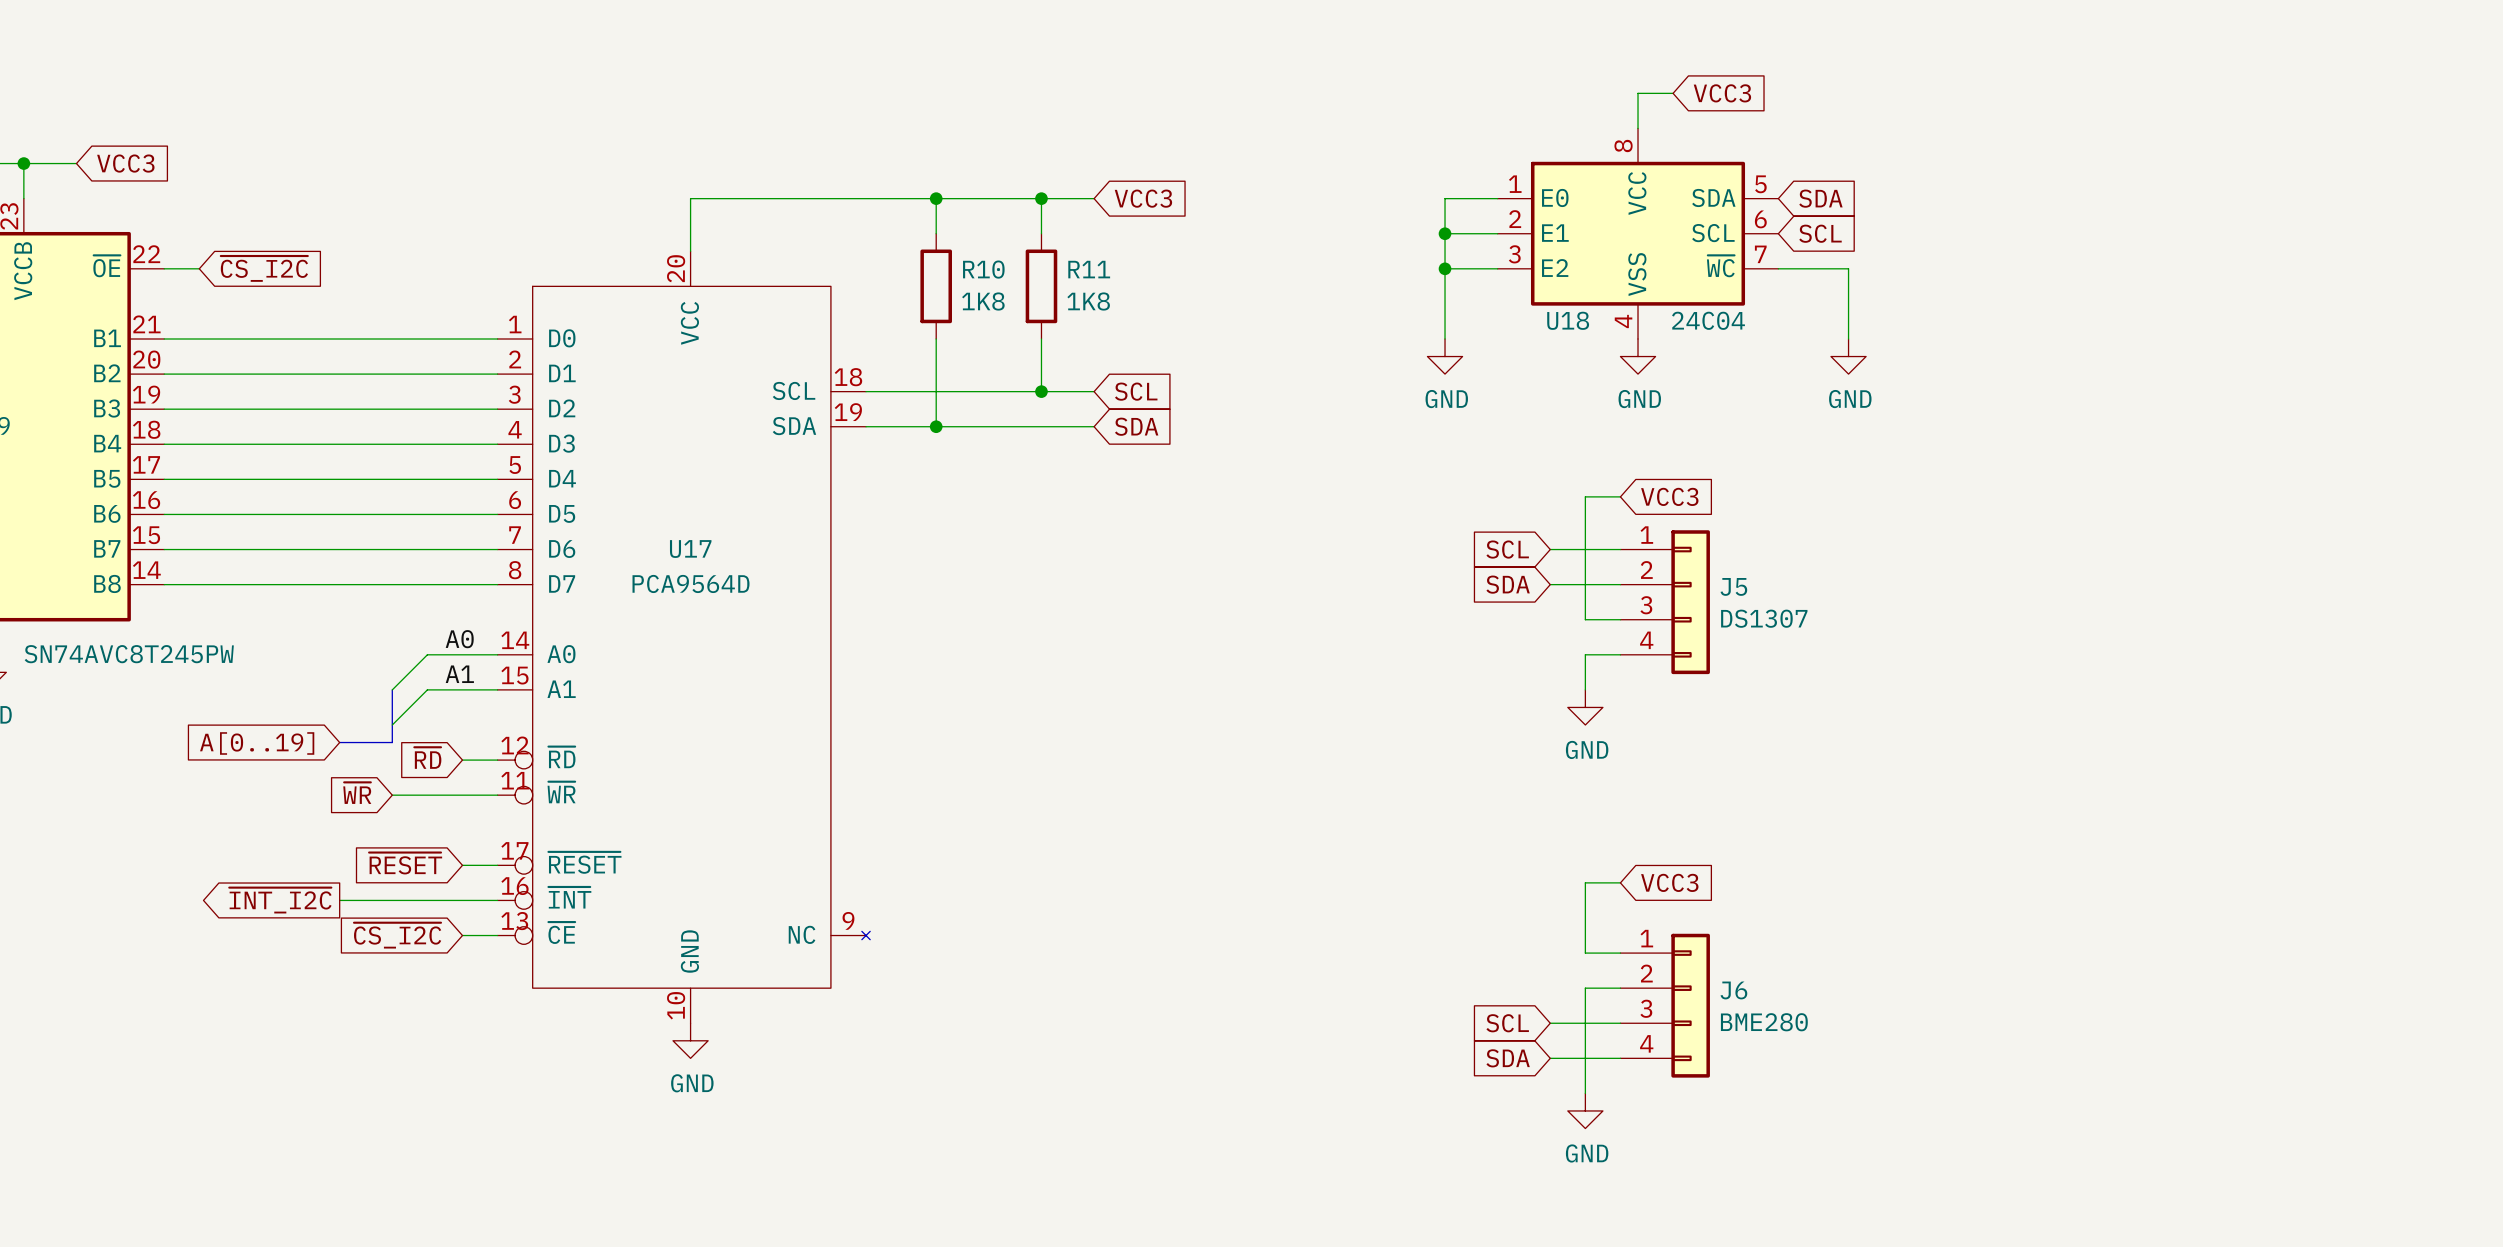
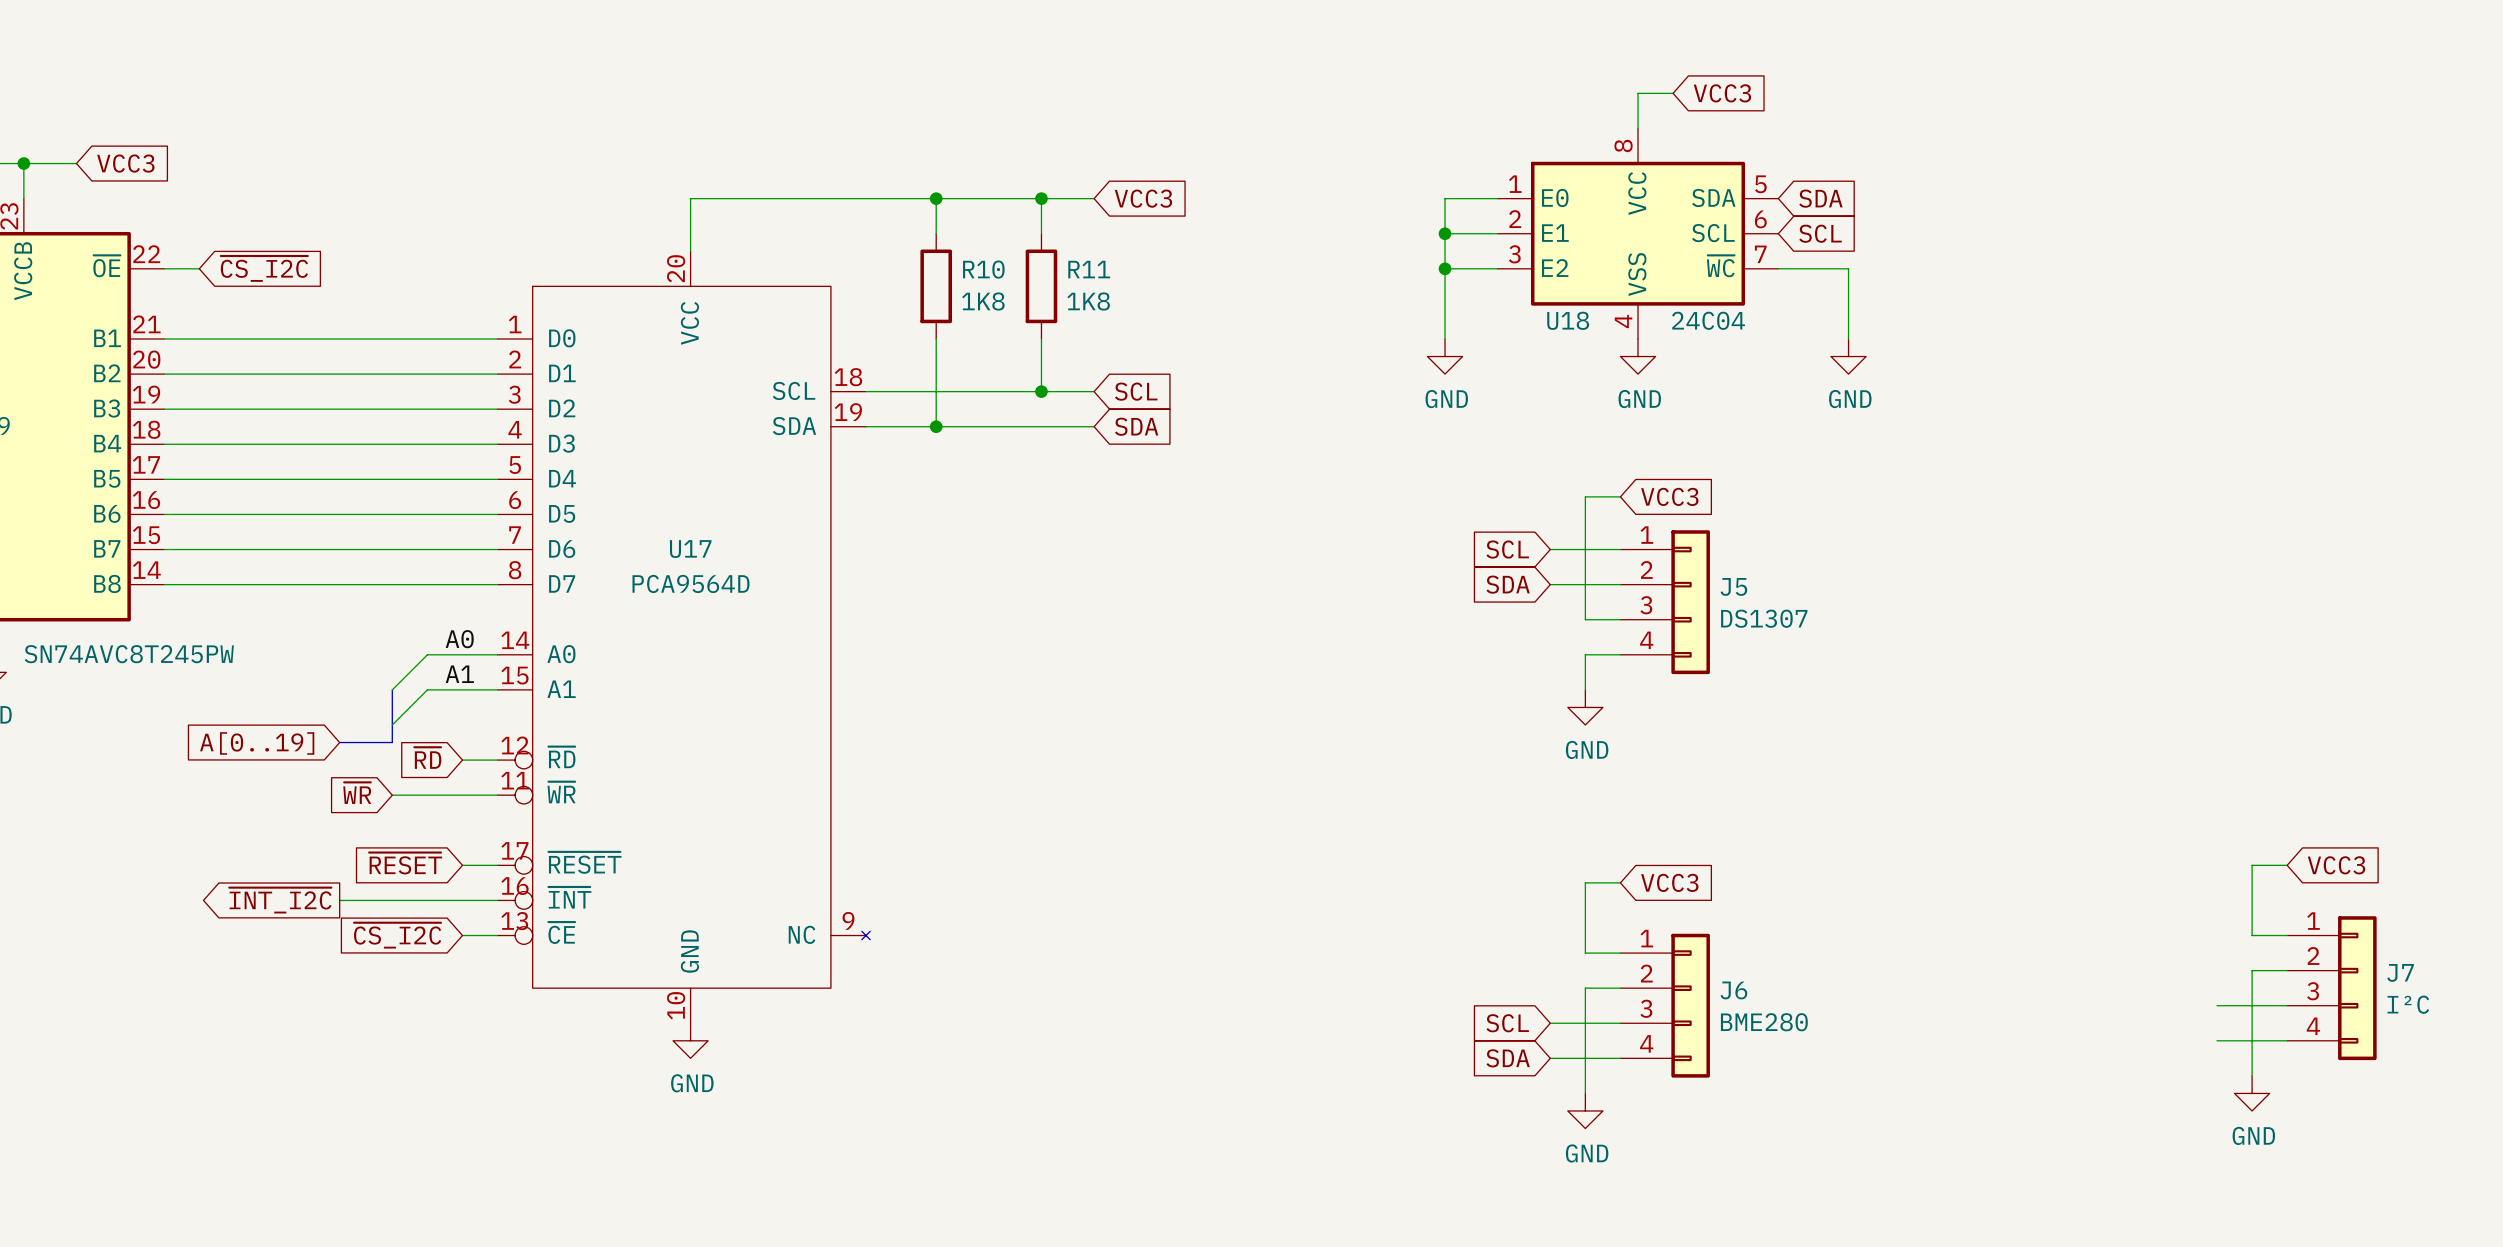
wire: none -> (2287, 865) (2252, 865) (2252, 935) (2287, 935)
global label: none -> VCC3 (2336, 865)
wire: none -> (2287, 970) (2252, 970) (2252, 1075)
J7: none -> I²C (2331, 988)
wire: none -> (2216, 1005) (2287, 1005)
wire: none -> (2216, 1040) (2287, 1040)
power symbol: none -> GND (2252, 1093)

